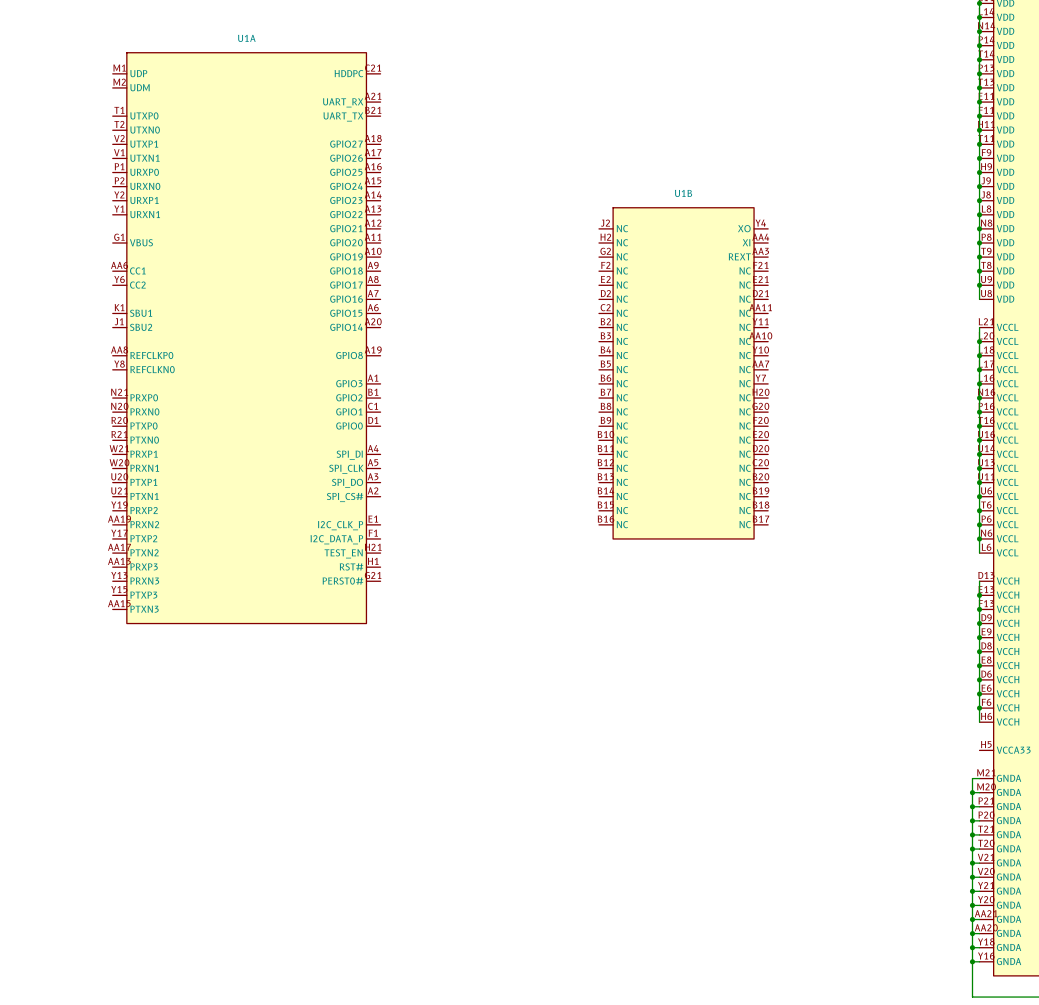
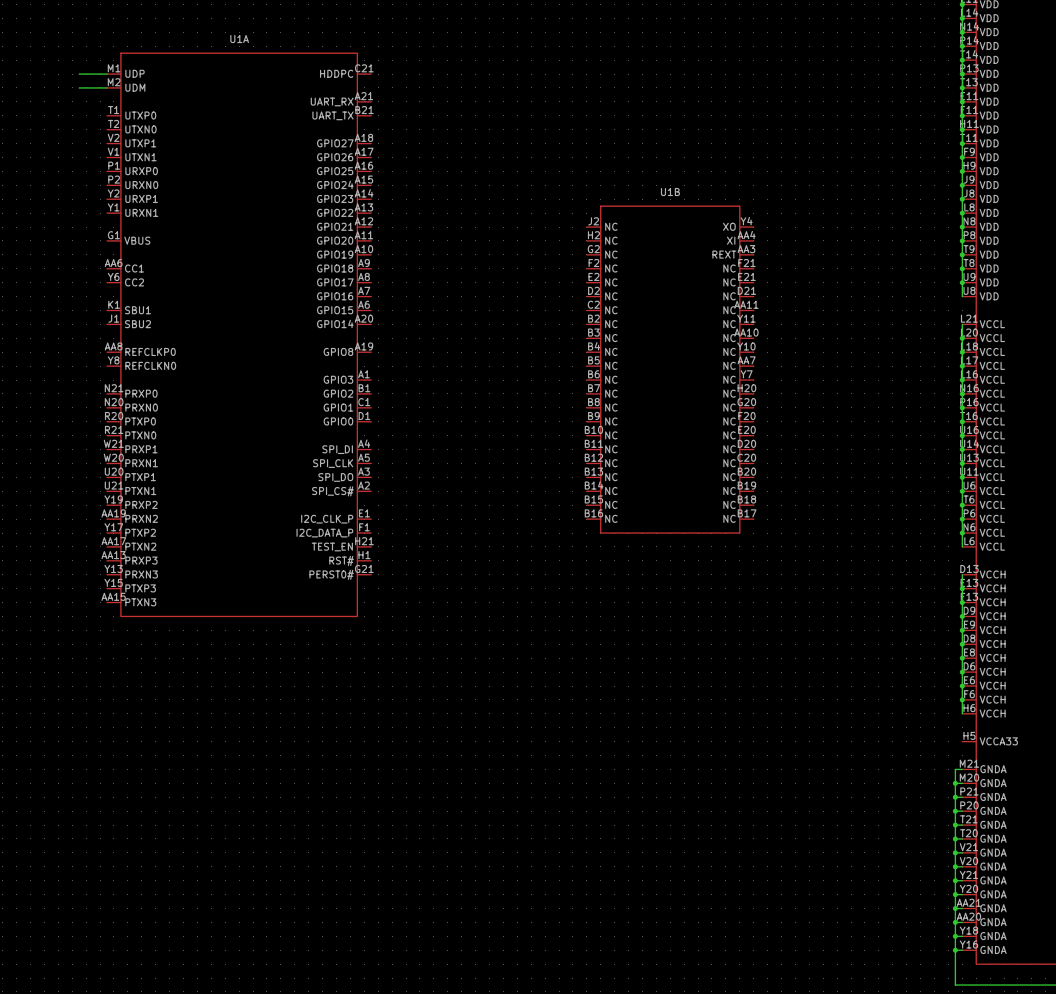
wire: none -> (79, 74) (107, 74)
wire: none -> (79, 87) (107, 87)

